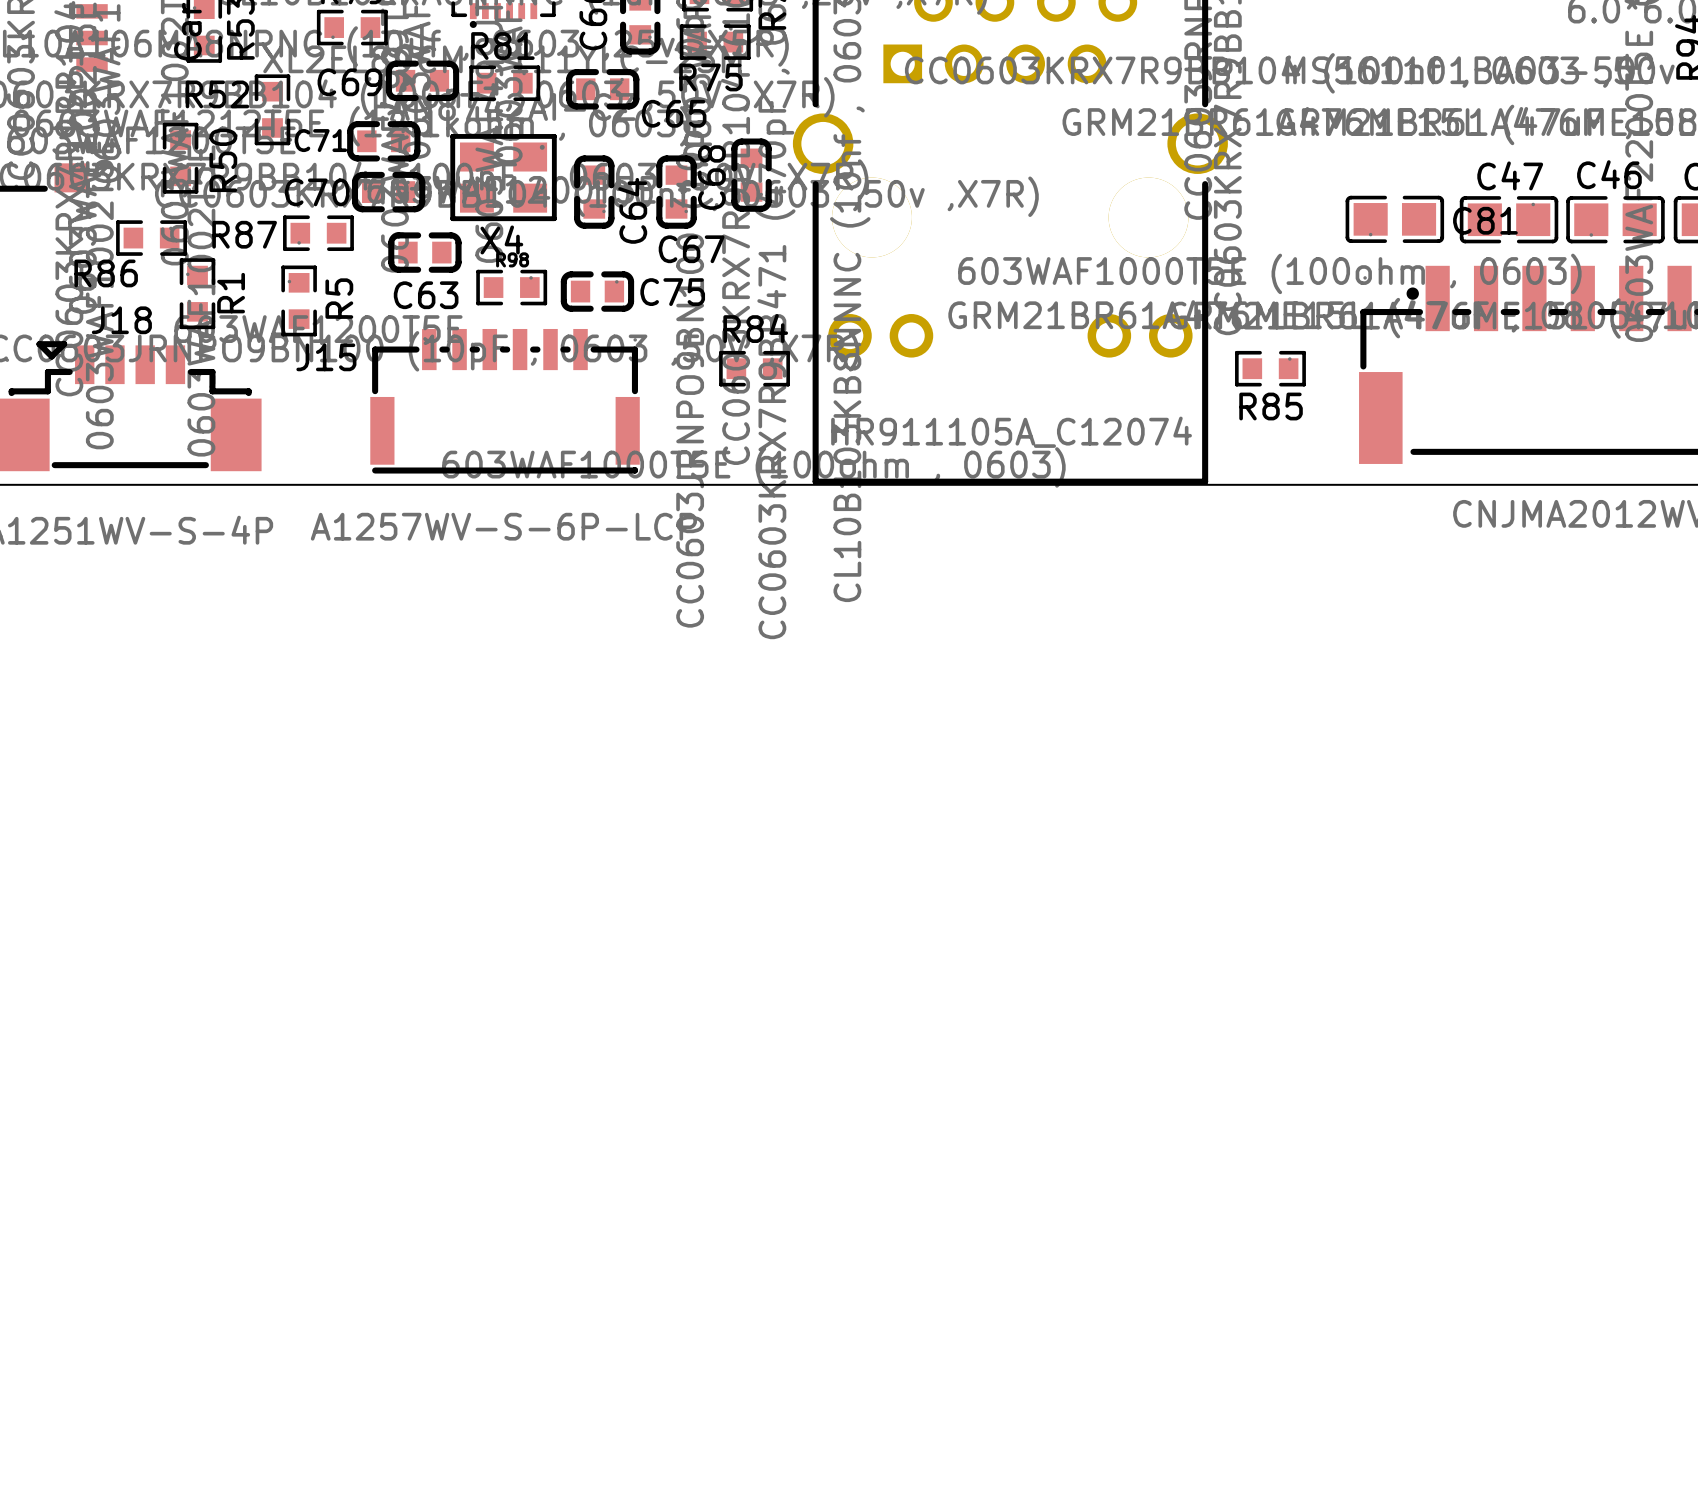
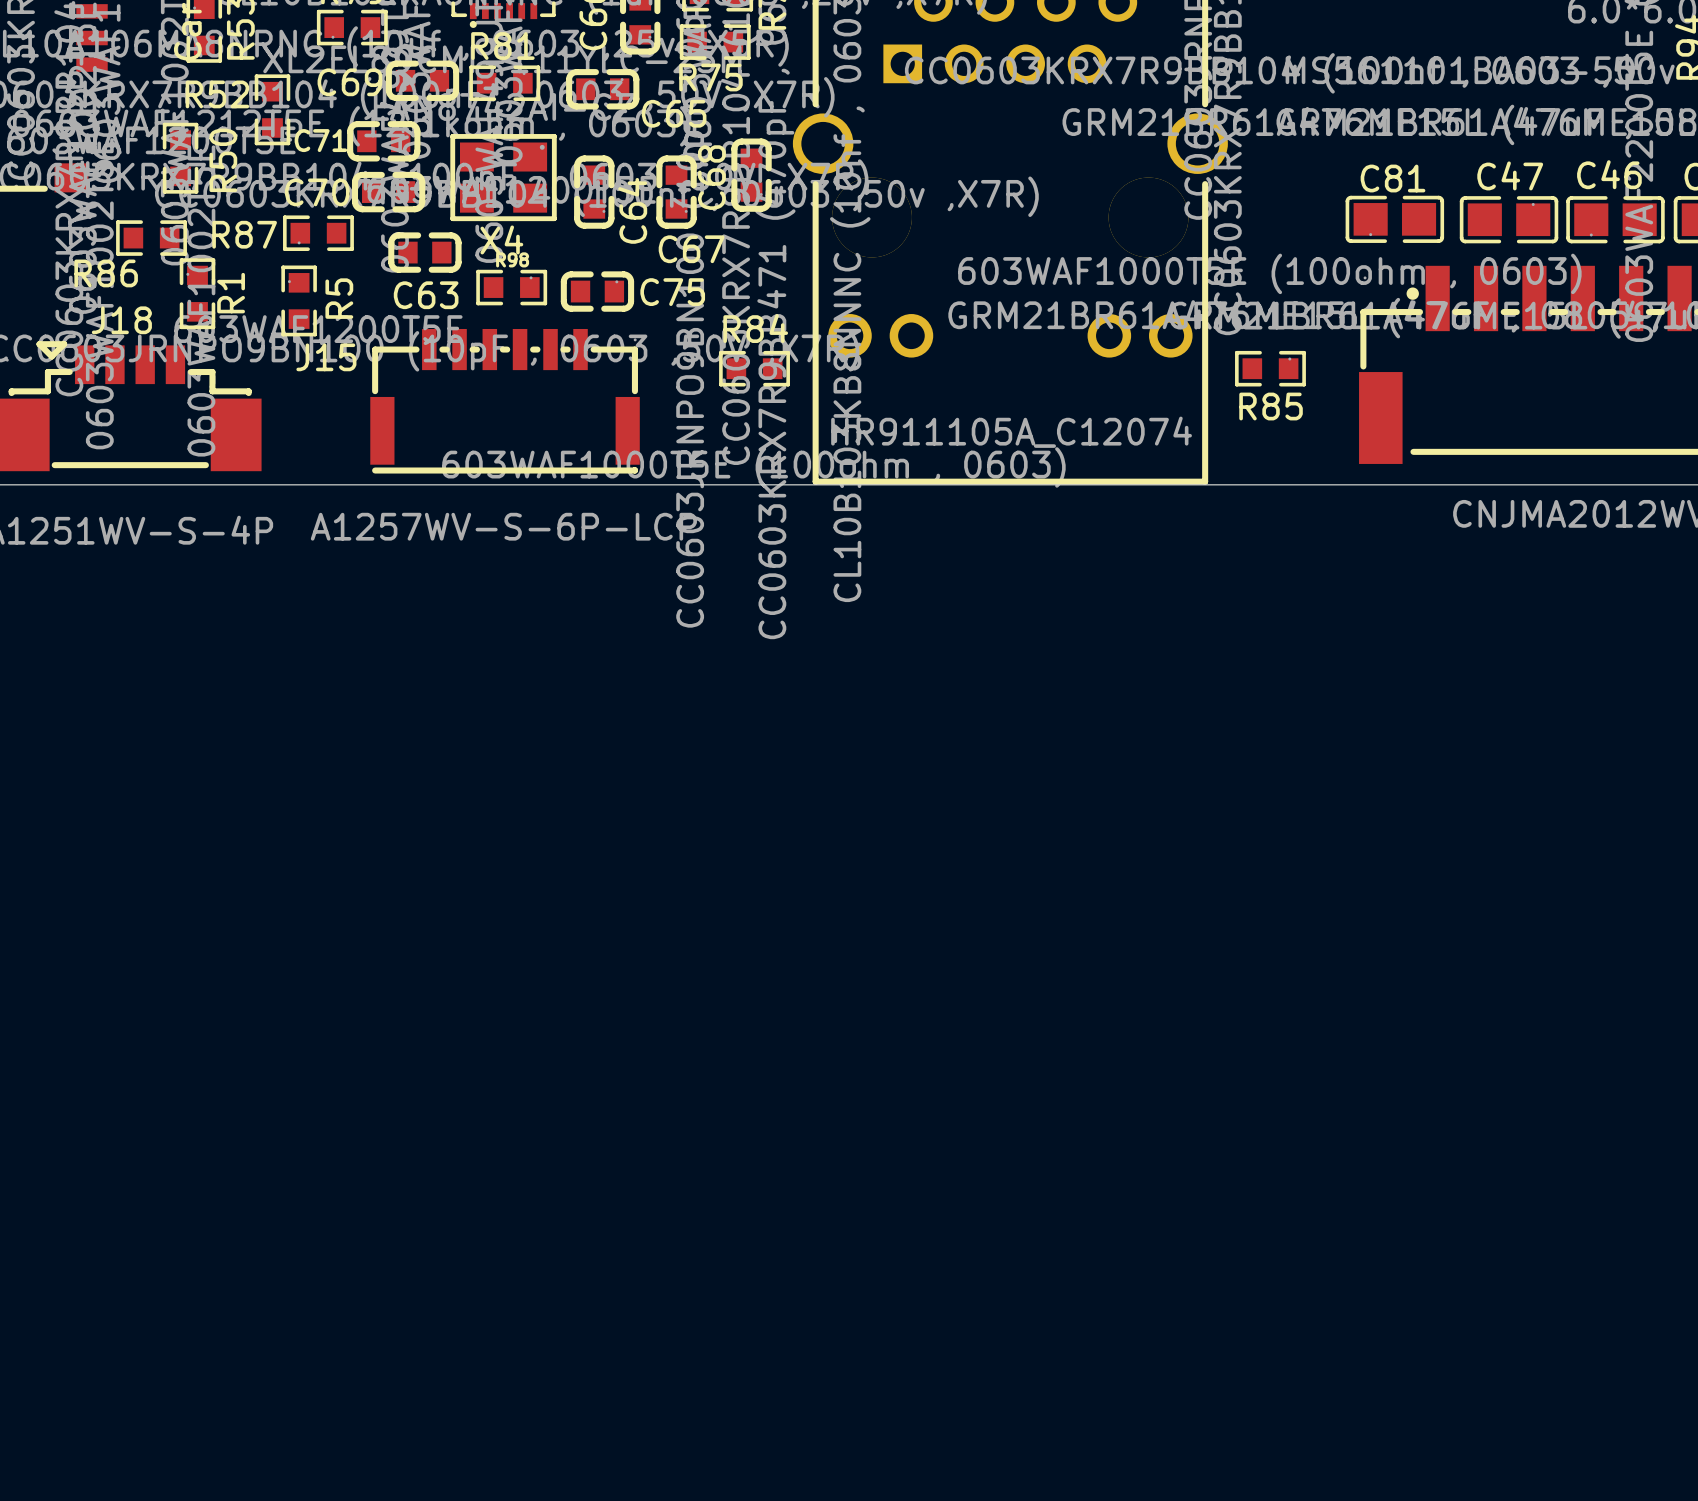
C81 name position: C81 (1485, 220) -> C81 (1393, 178)

